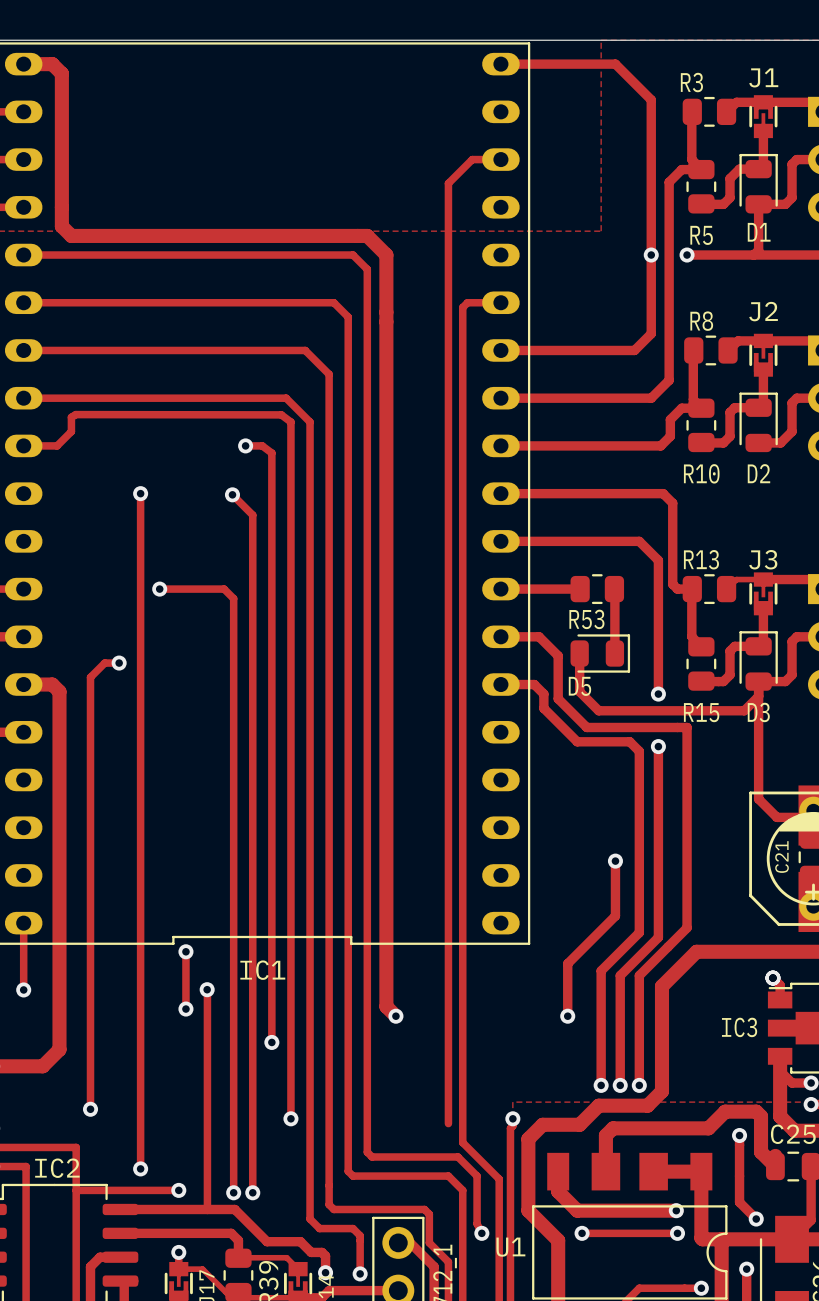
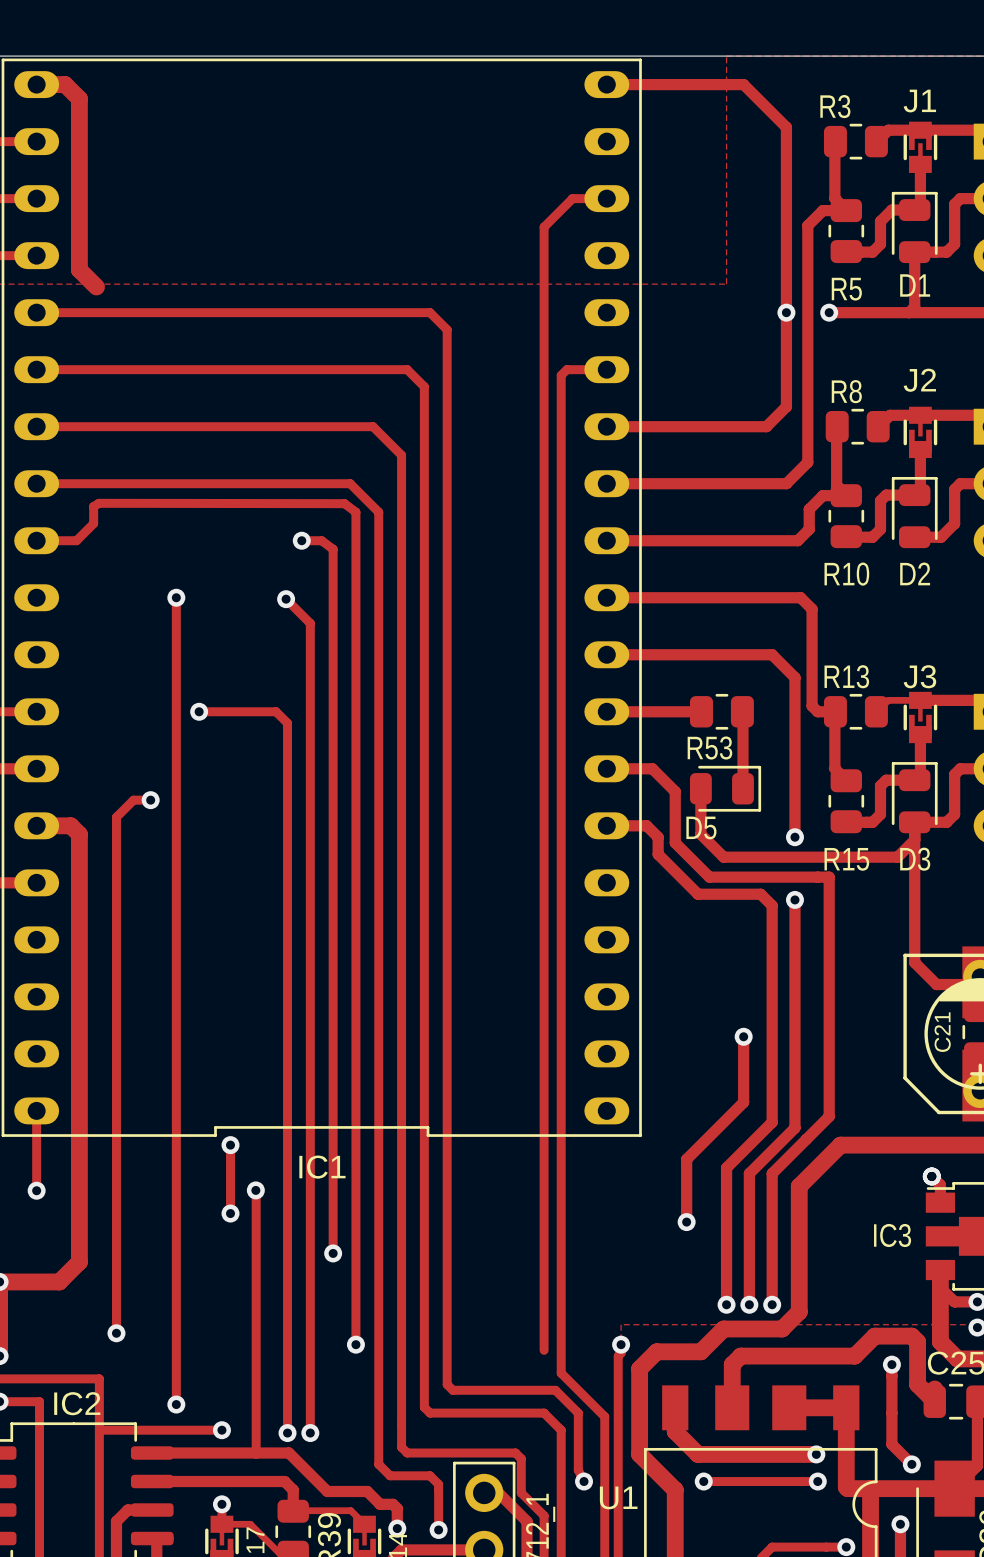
track: (47, 64) (52, 64) (61, 73) (61, 226) (71, 235) (367, 235) (386, 255) (386, 1006) (395, 1016) -> (65, 84) (79, 98) (79, 269) (96, 287)
via: (395, 1016) -> none

